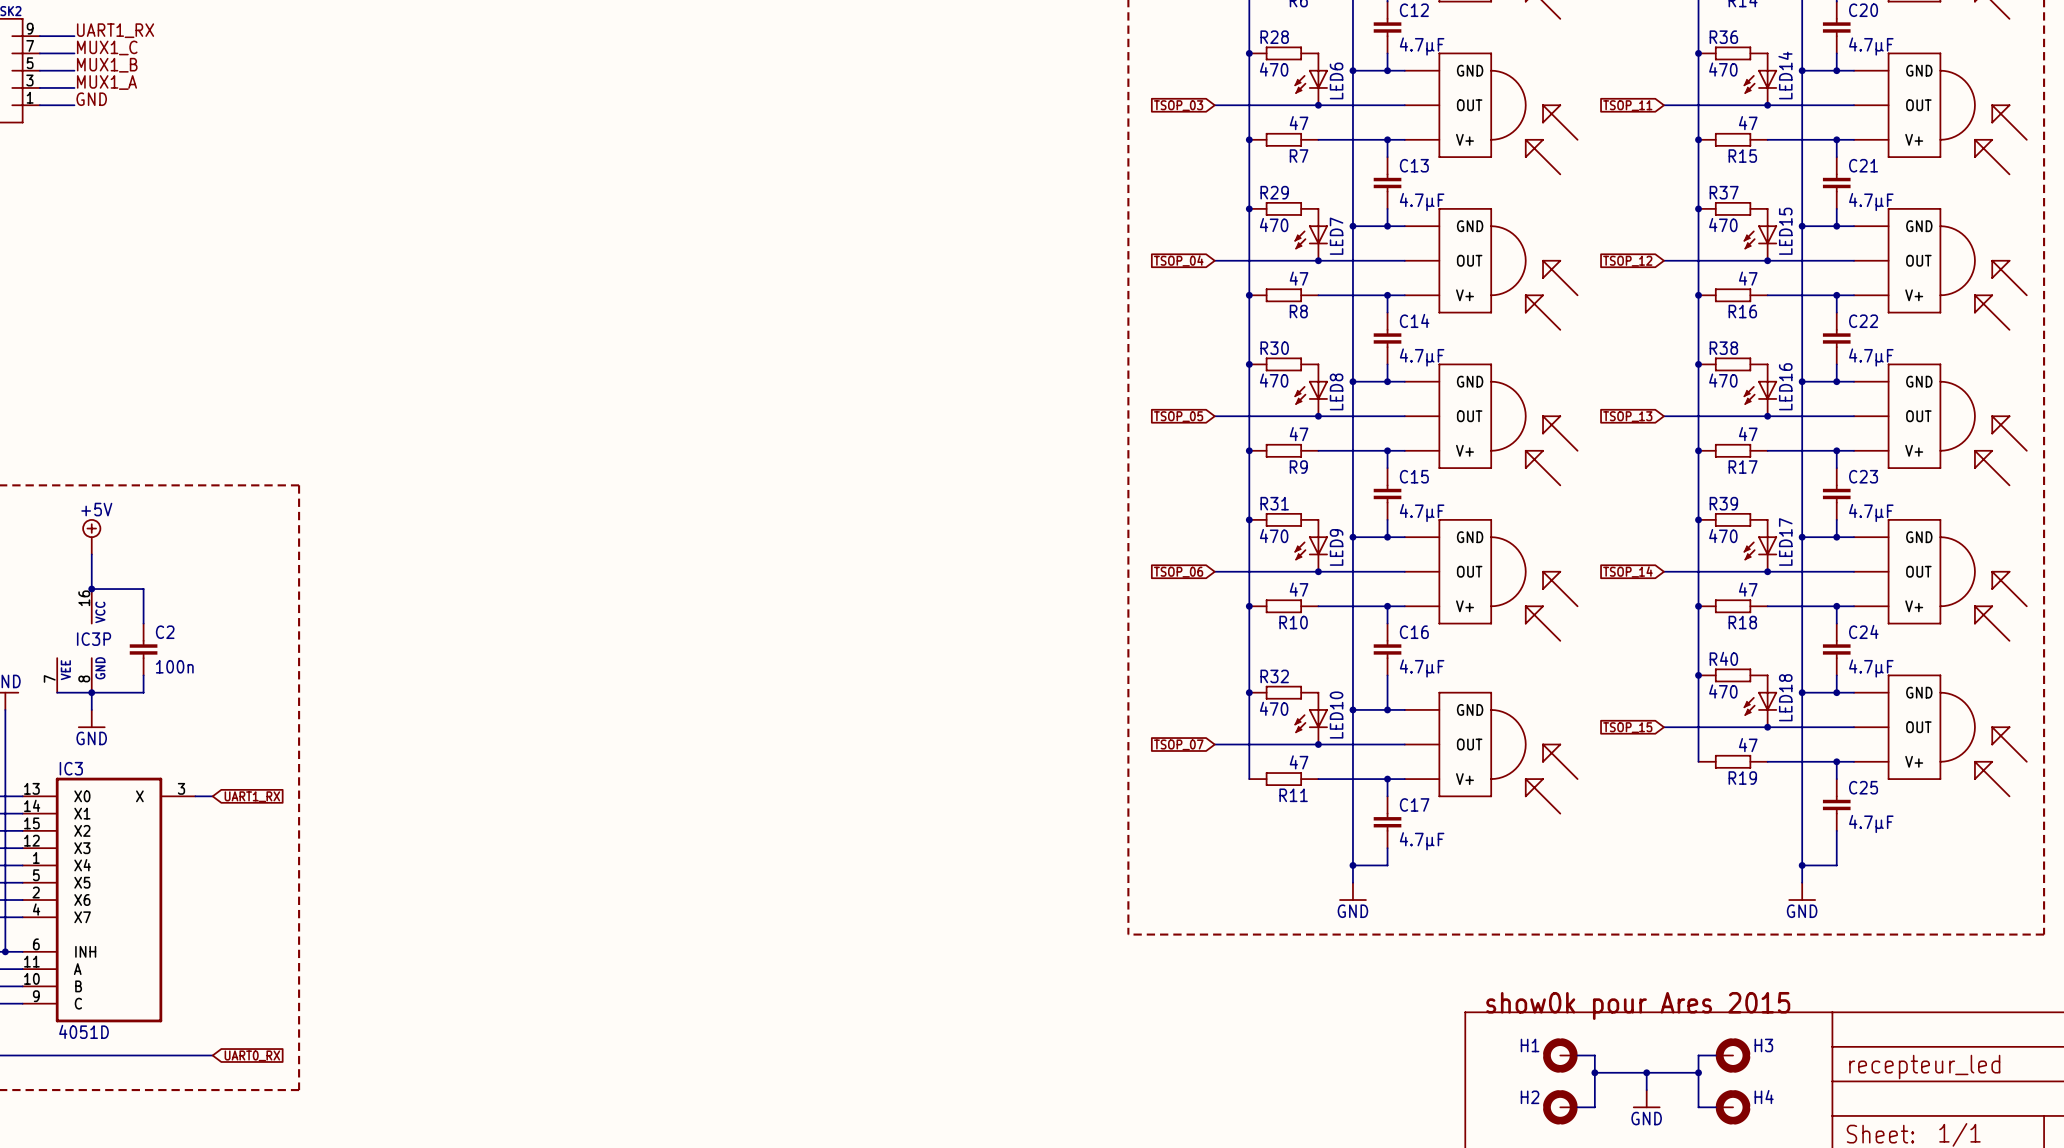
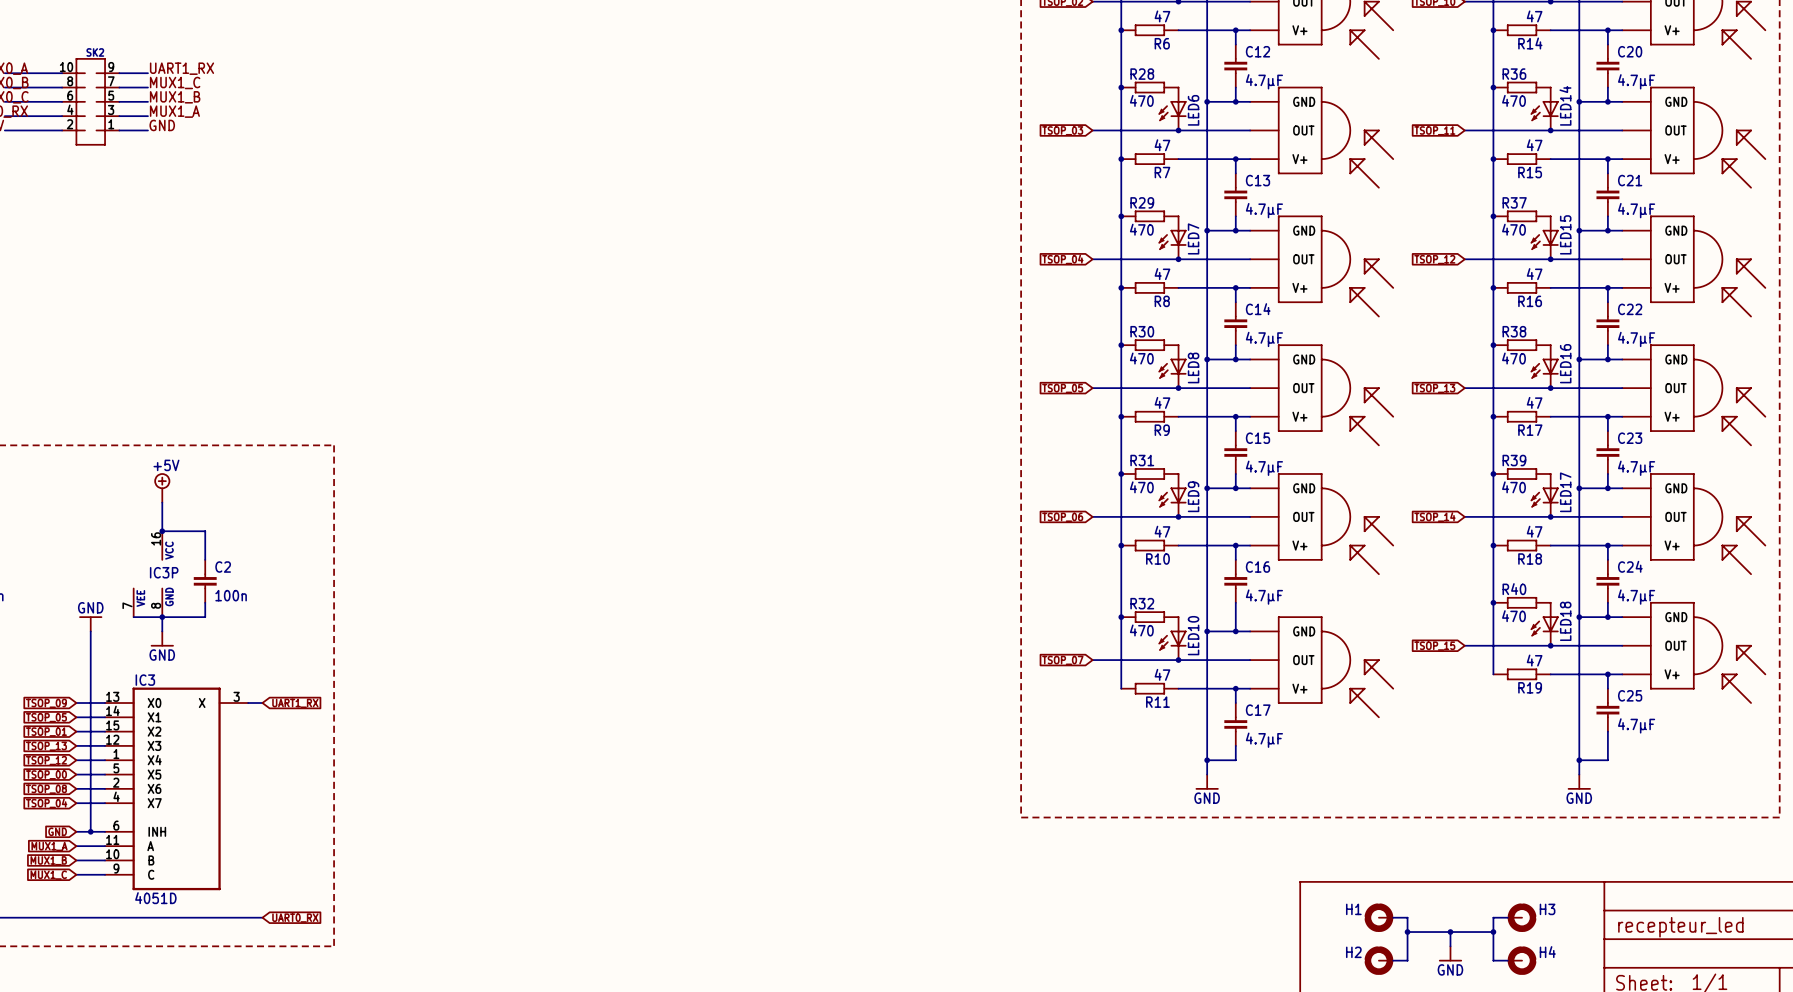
text: show0k pour Ares 2015 (1638, 1005) -> none

